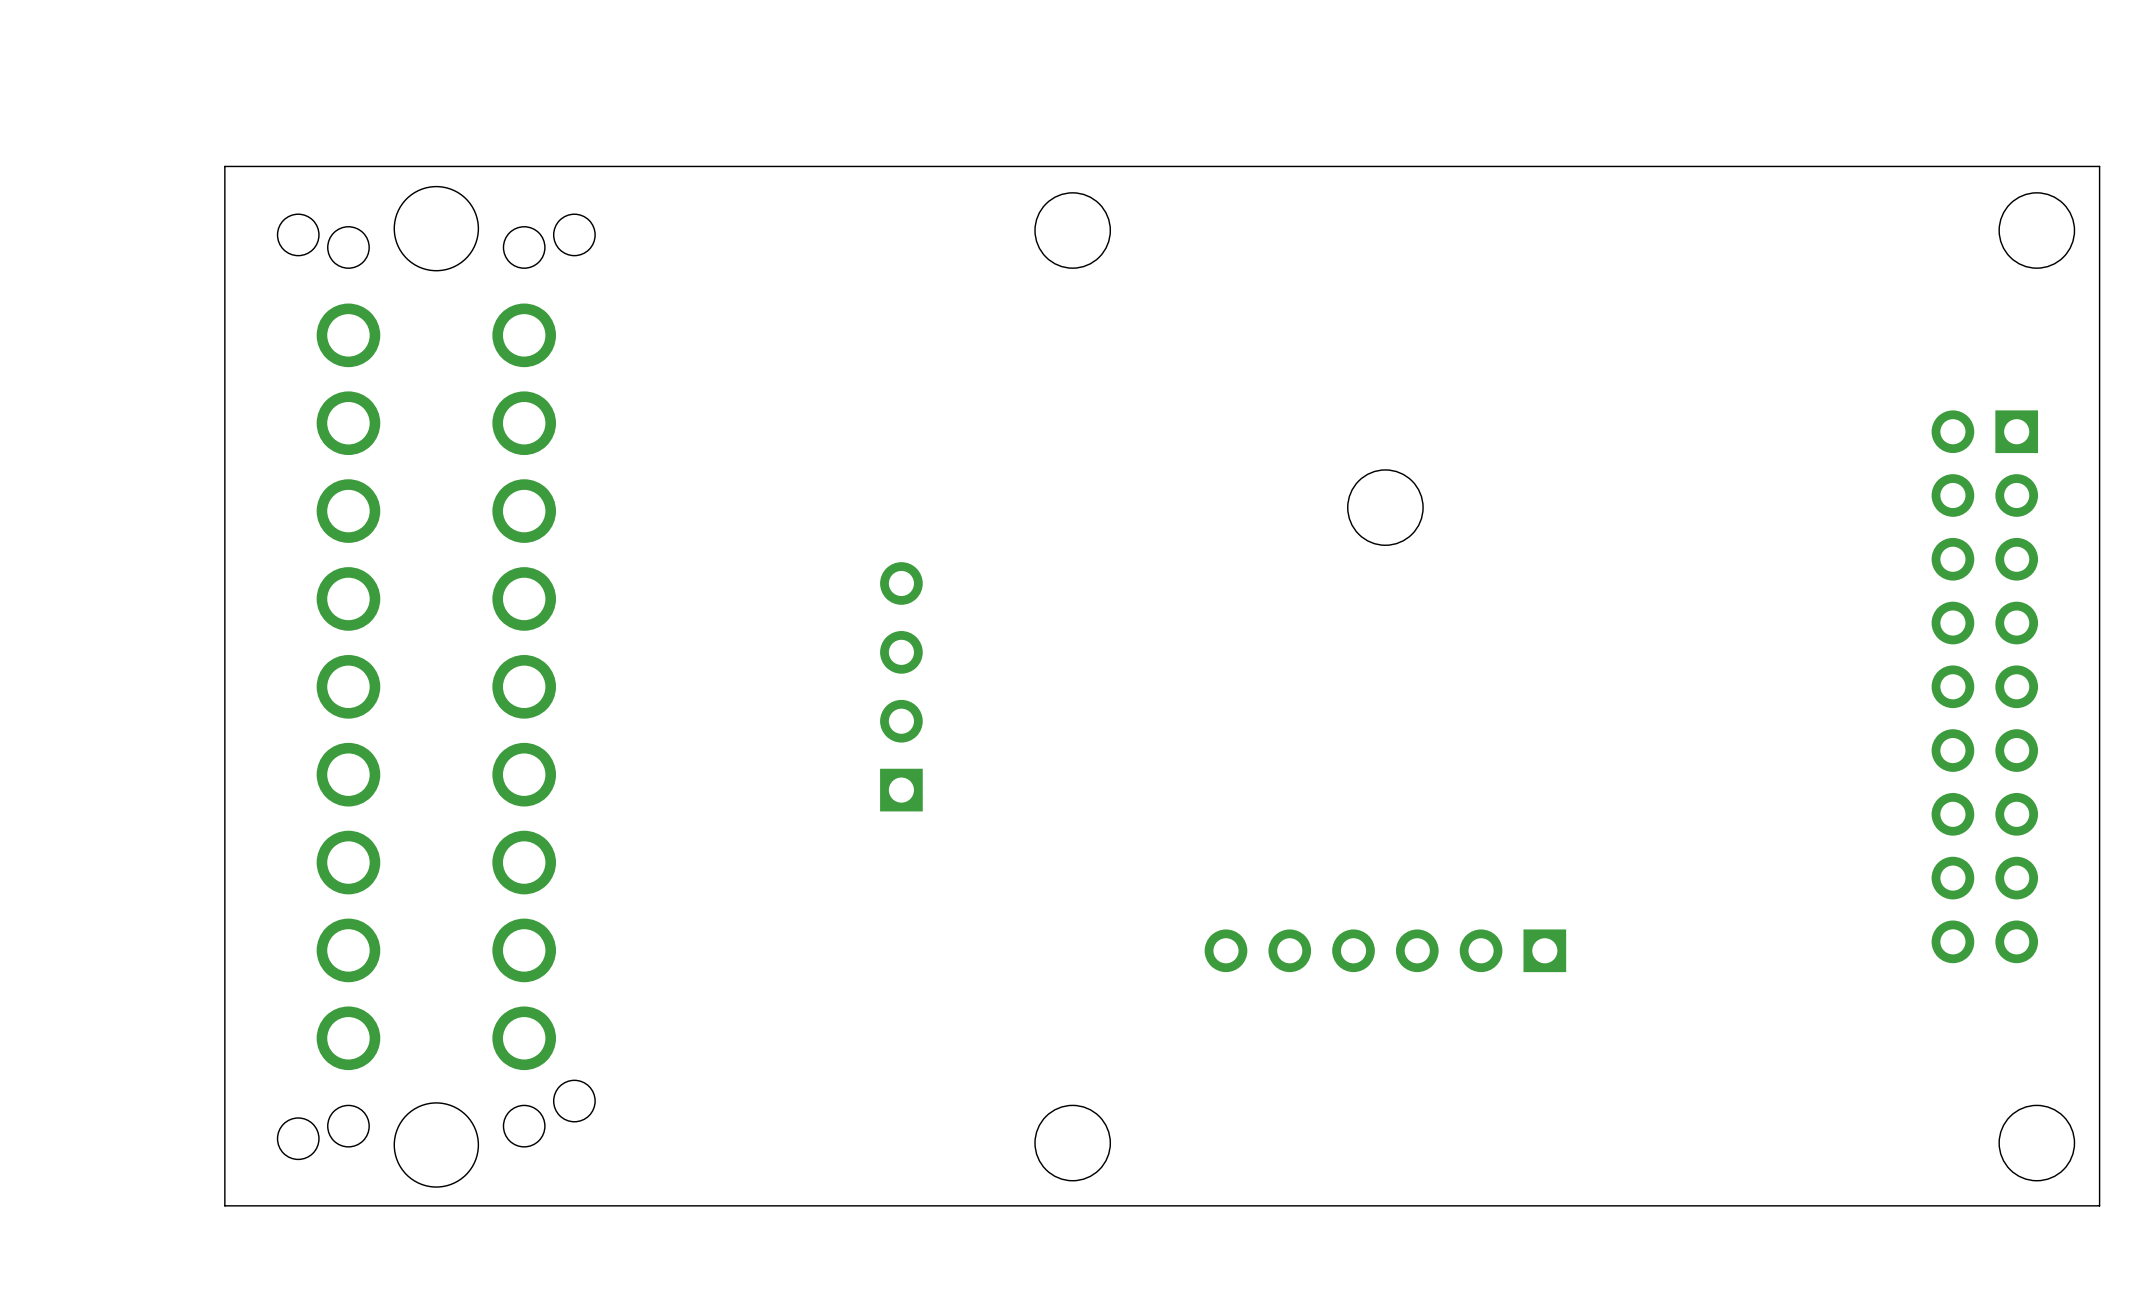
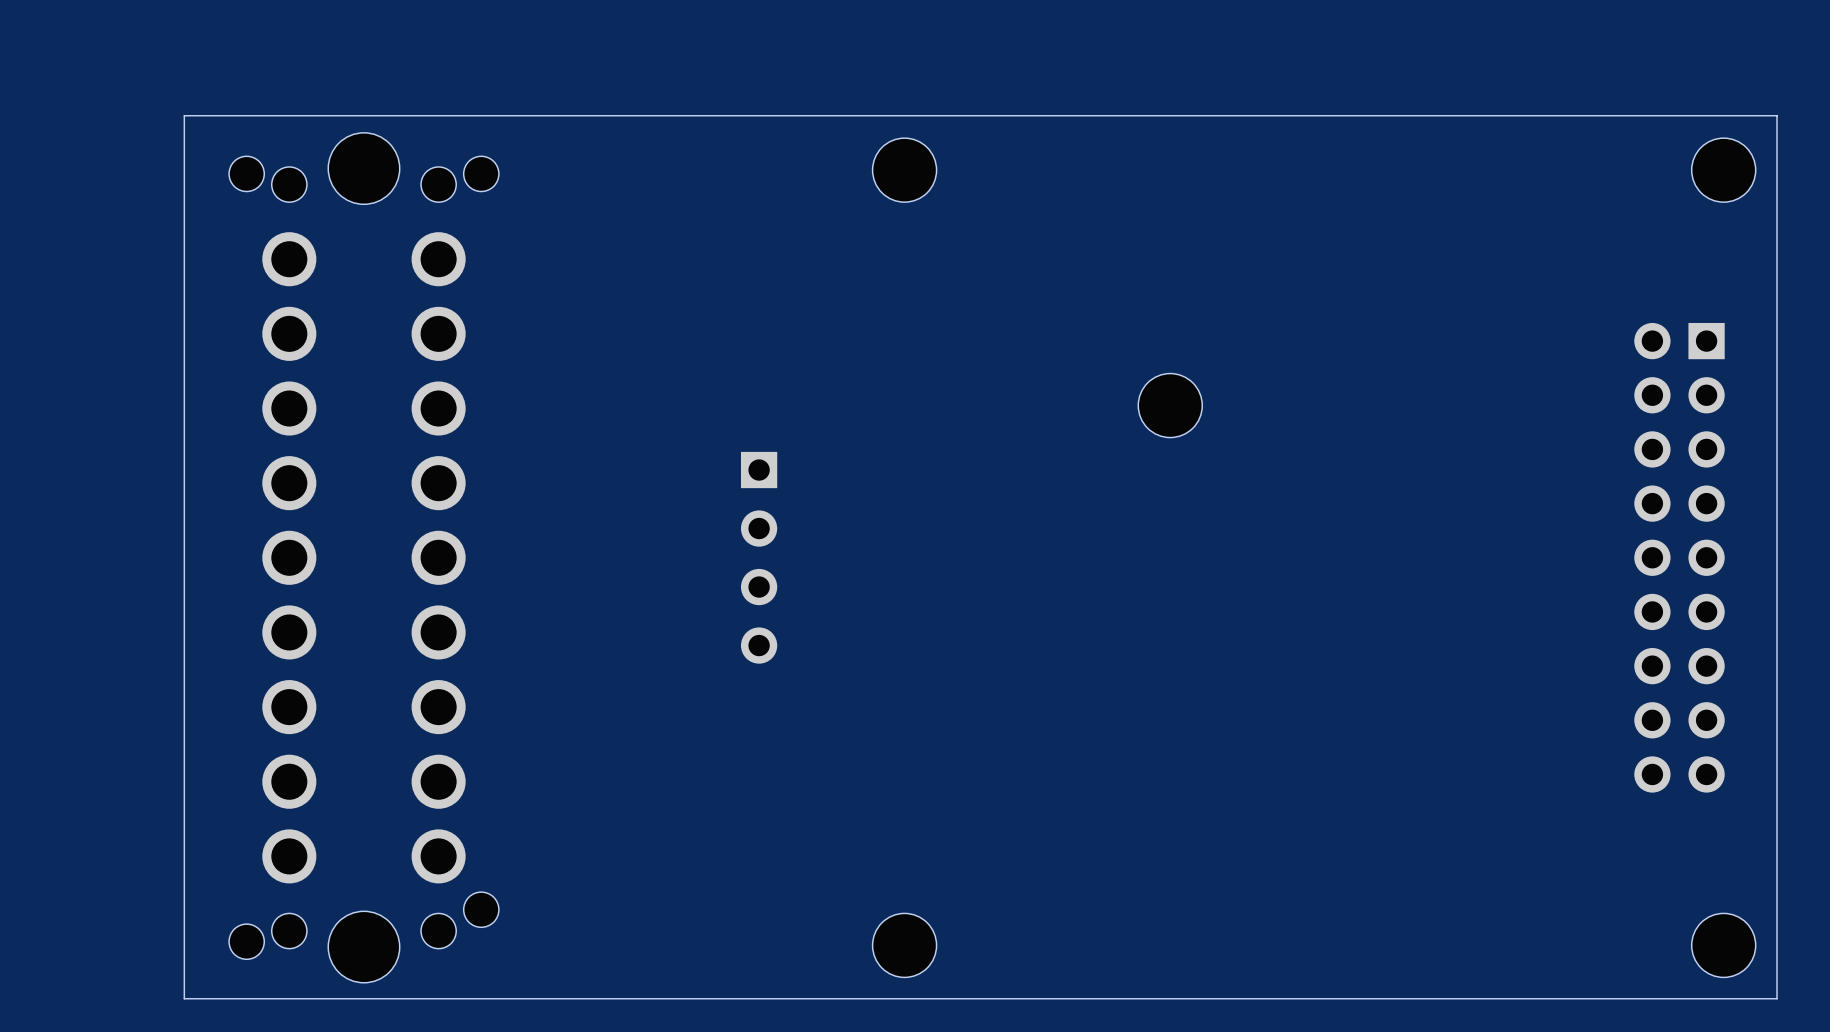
part rotation: 0° (901, 686) -> 180° (759, 557)
part: (1385, 950) -> none

